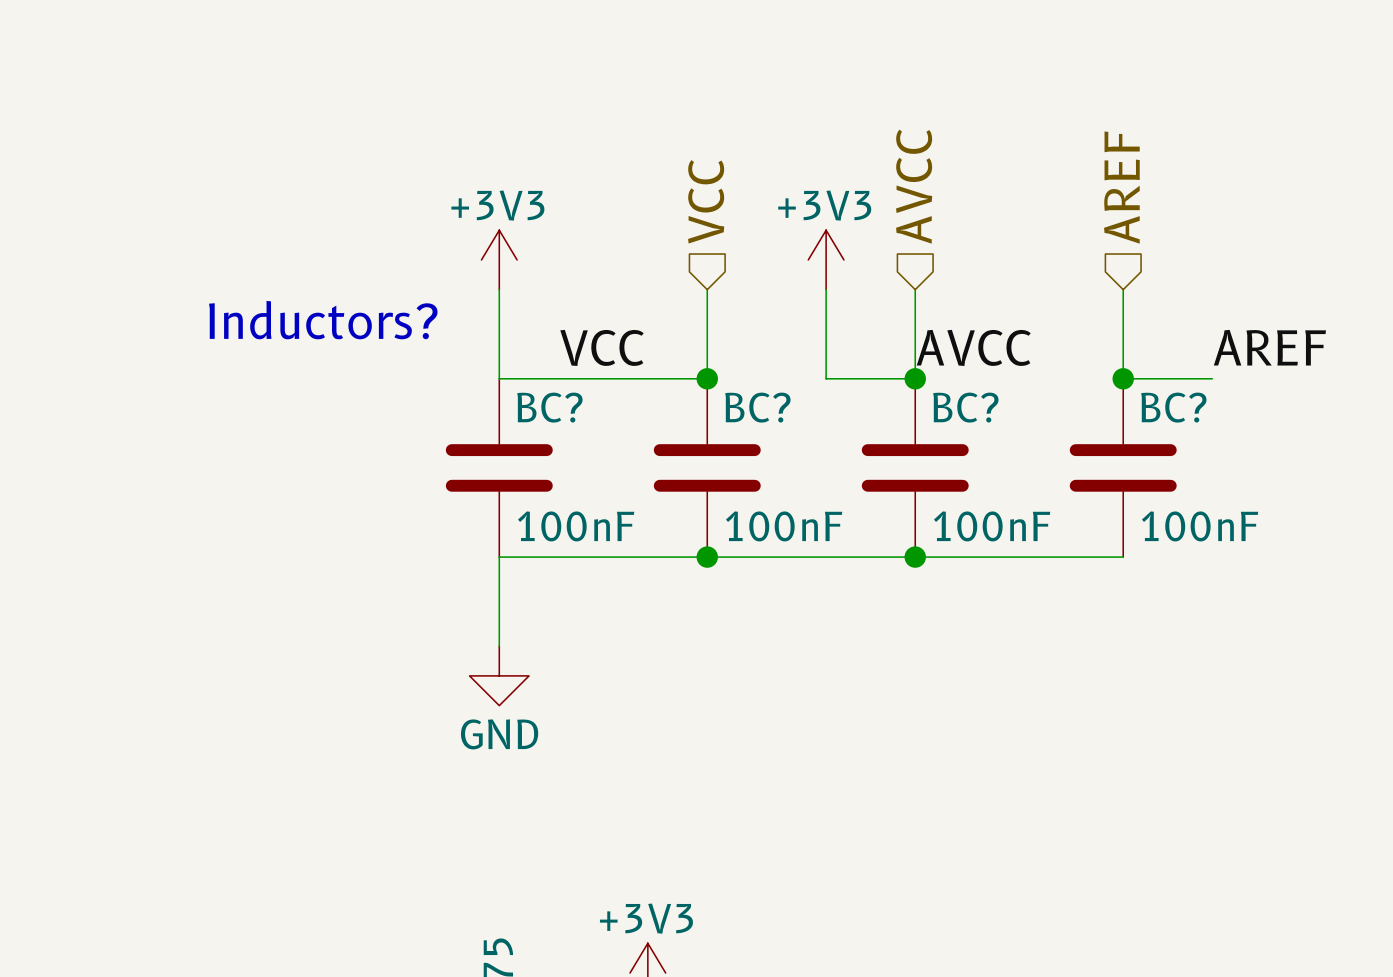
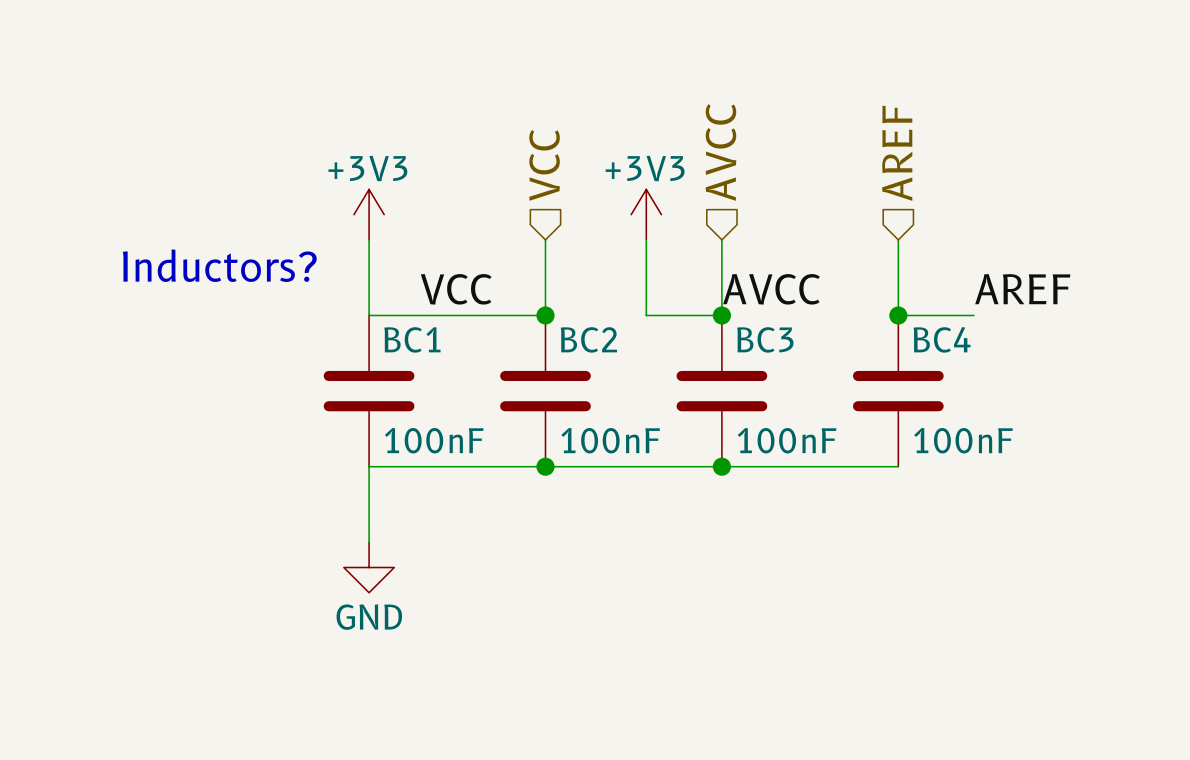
BC? name: BC? (549, 407) -> BC1 (412, 339)
BC? name: BC? (757, 407) -> BC2 (588, 339)
BC? name: BC? (965, 407) -> BC3 (765, 339)
BC? name: BC? (1173, 407) -> BC4 (942, 339)

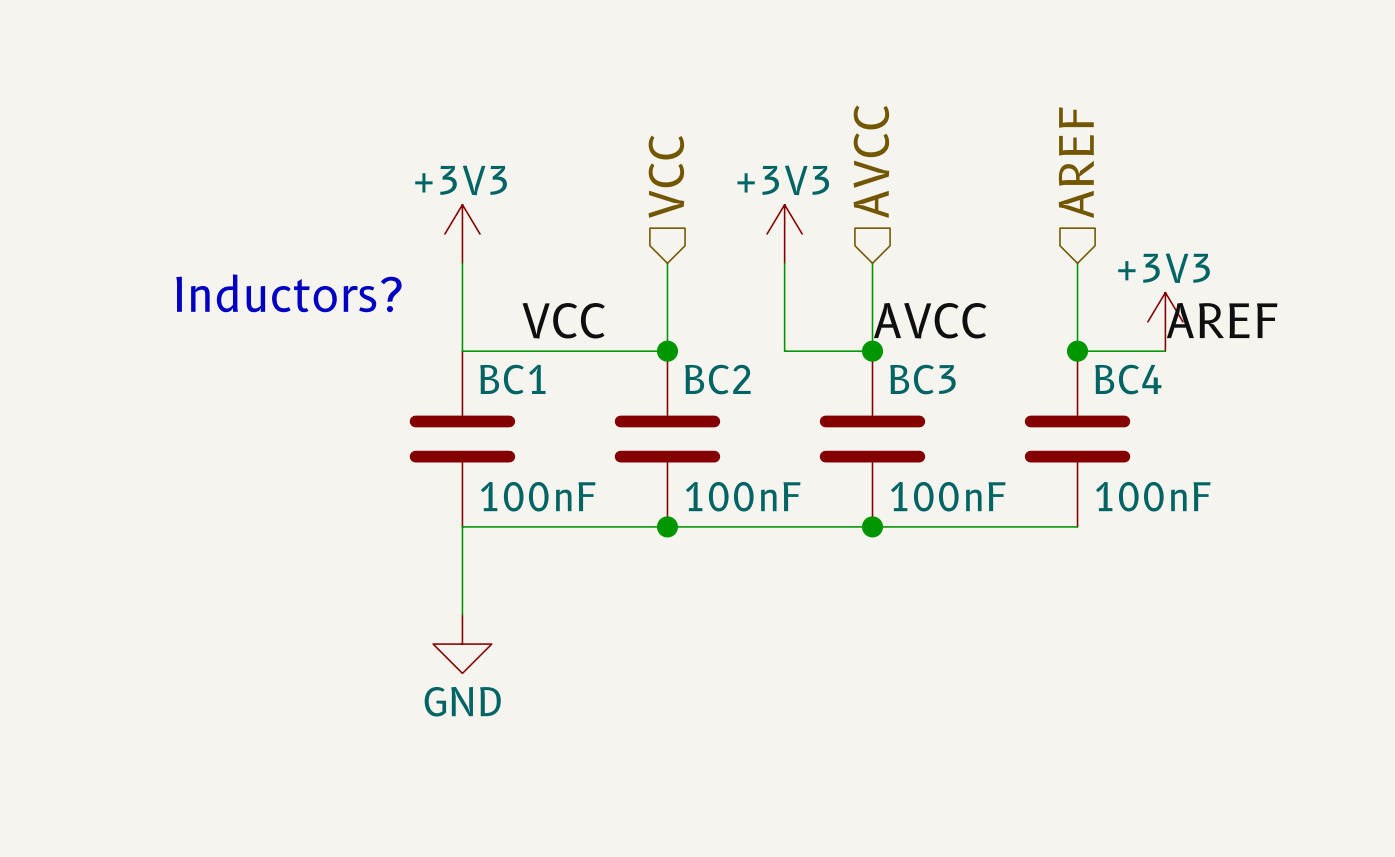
power symbol: none -> +3V3 (1165, 321)

